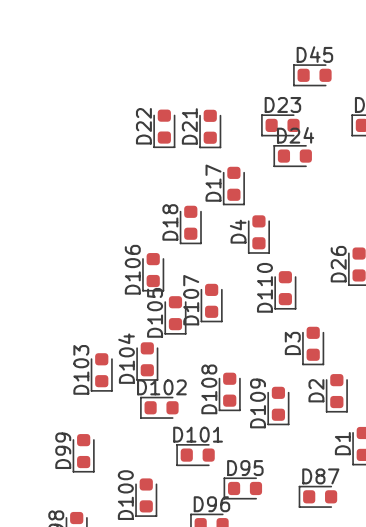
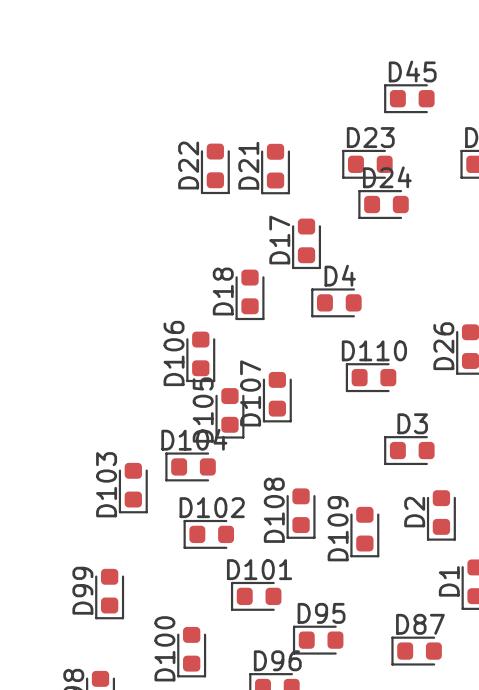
D4 rotation: 0° (258, 234) -> 90° clockwise (336, 302)
D110 rotation: 0° (285, 290) -> 90° clockwise (371, 377)
D3 rotation: 0° (313, 346) -> 90° clockwise (409, 450)
D104 rotation: 0° (147, 361) -> 90° clockwise (190, 466)

